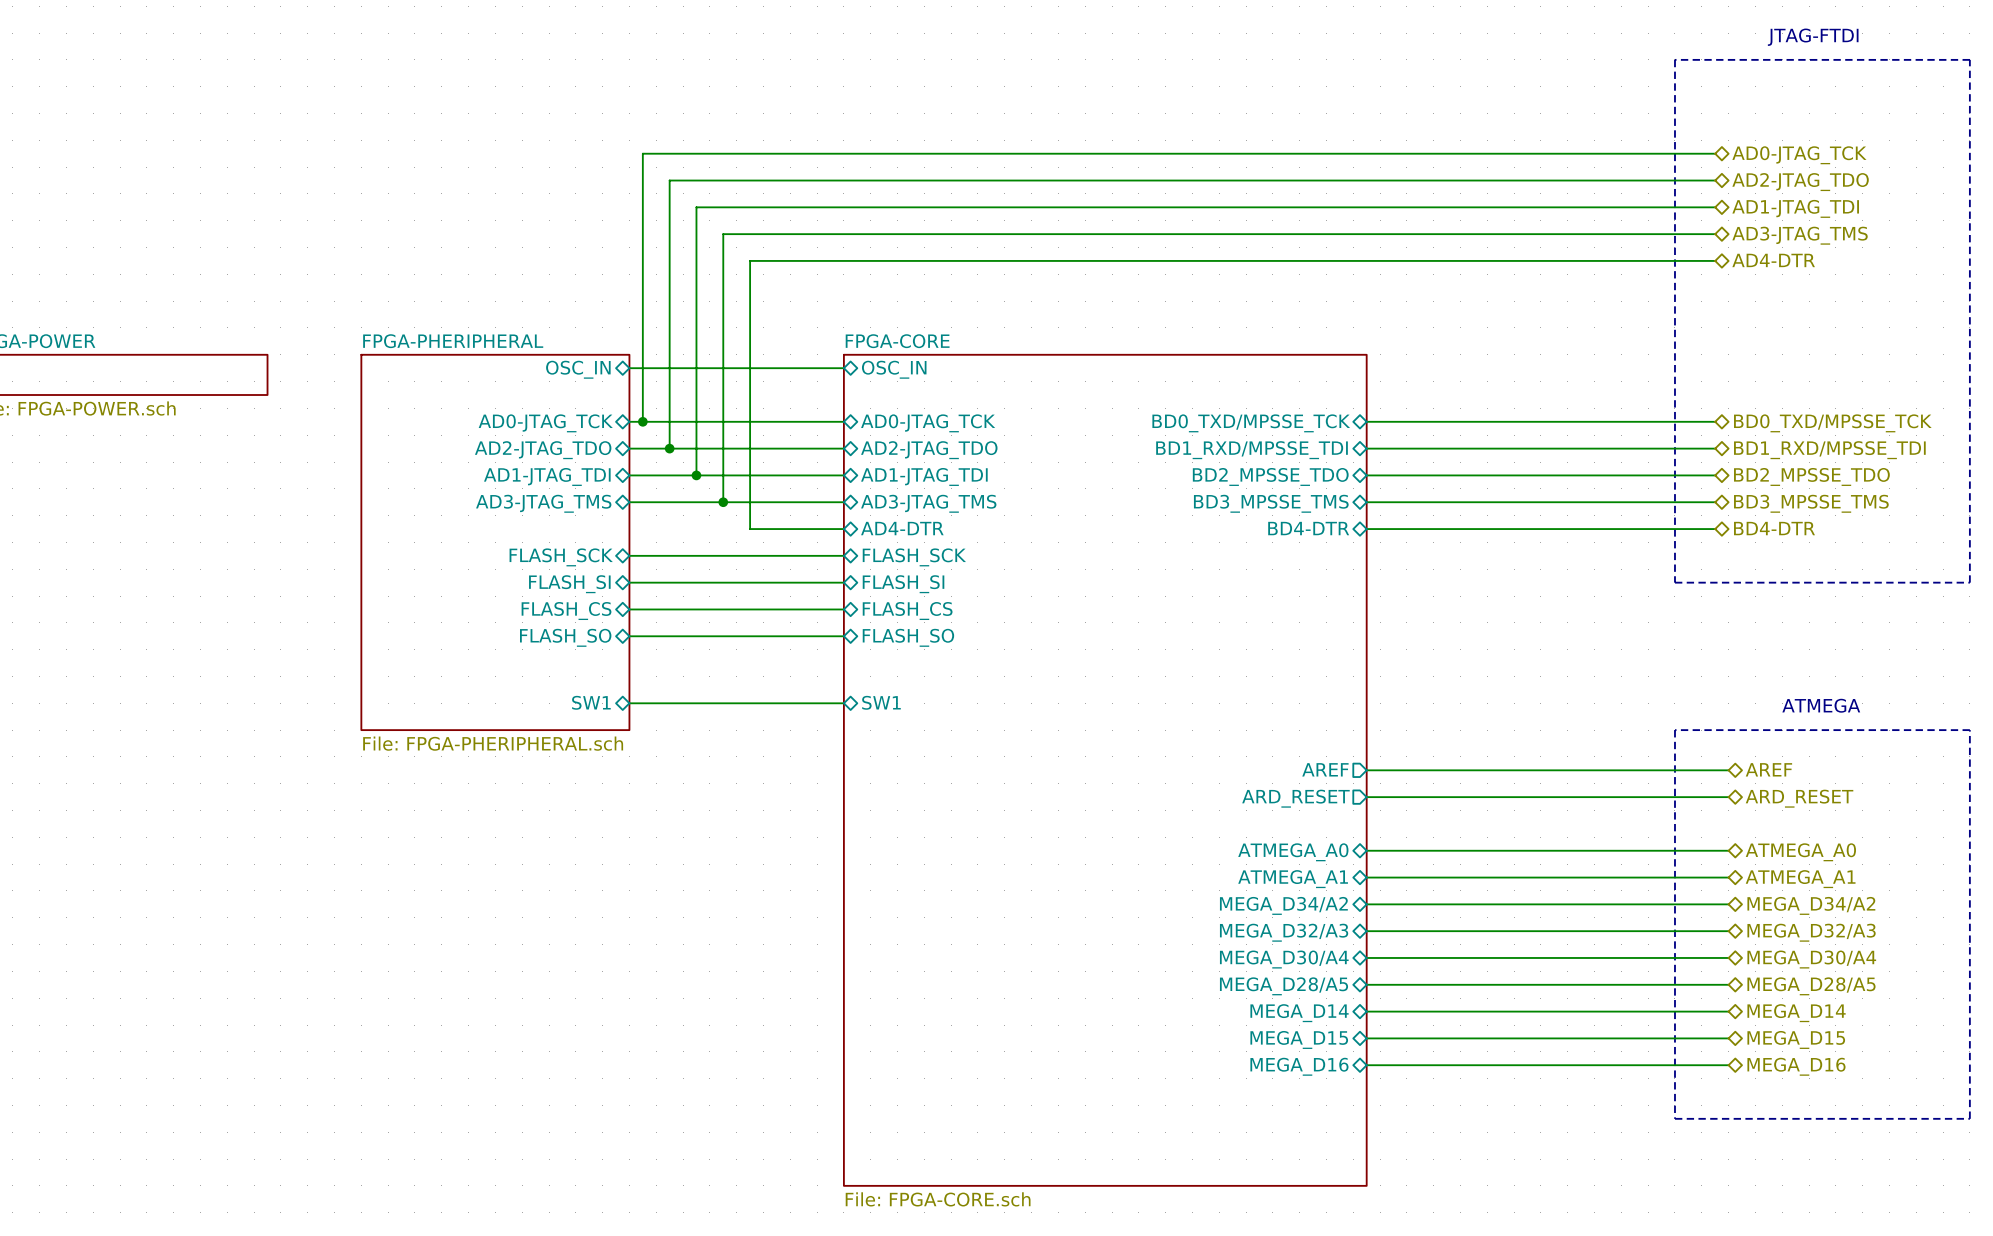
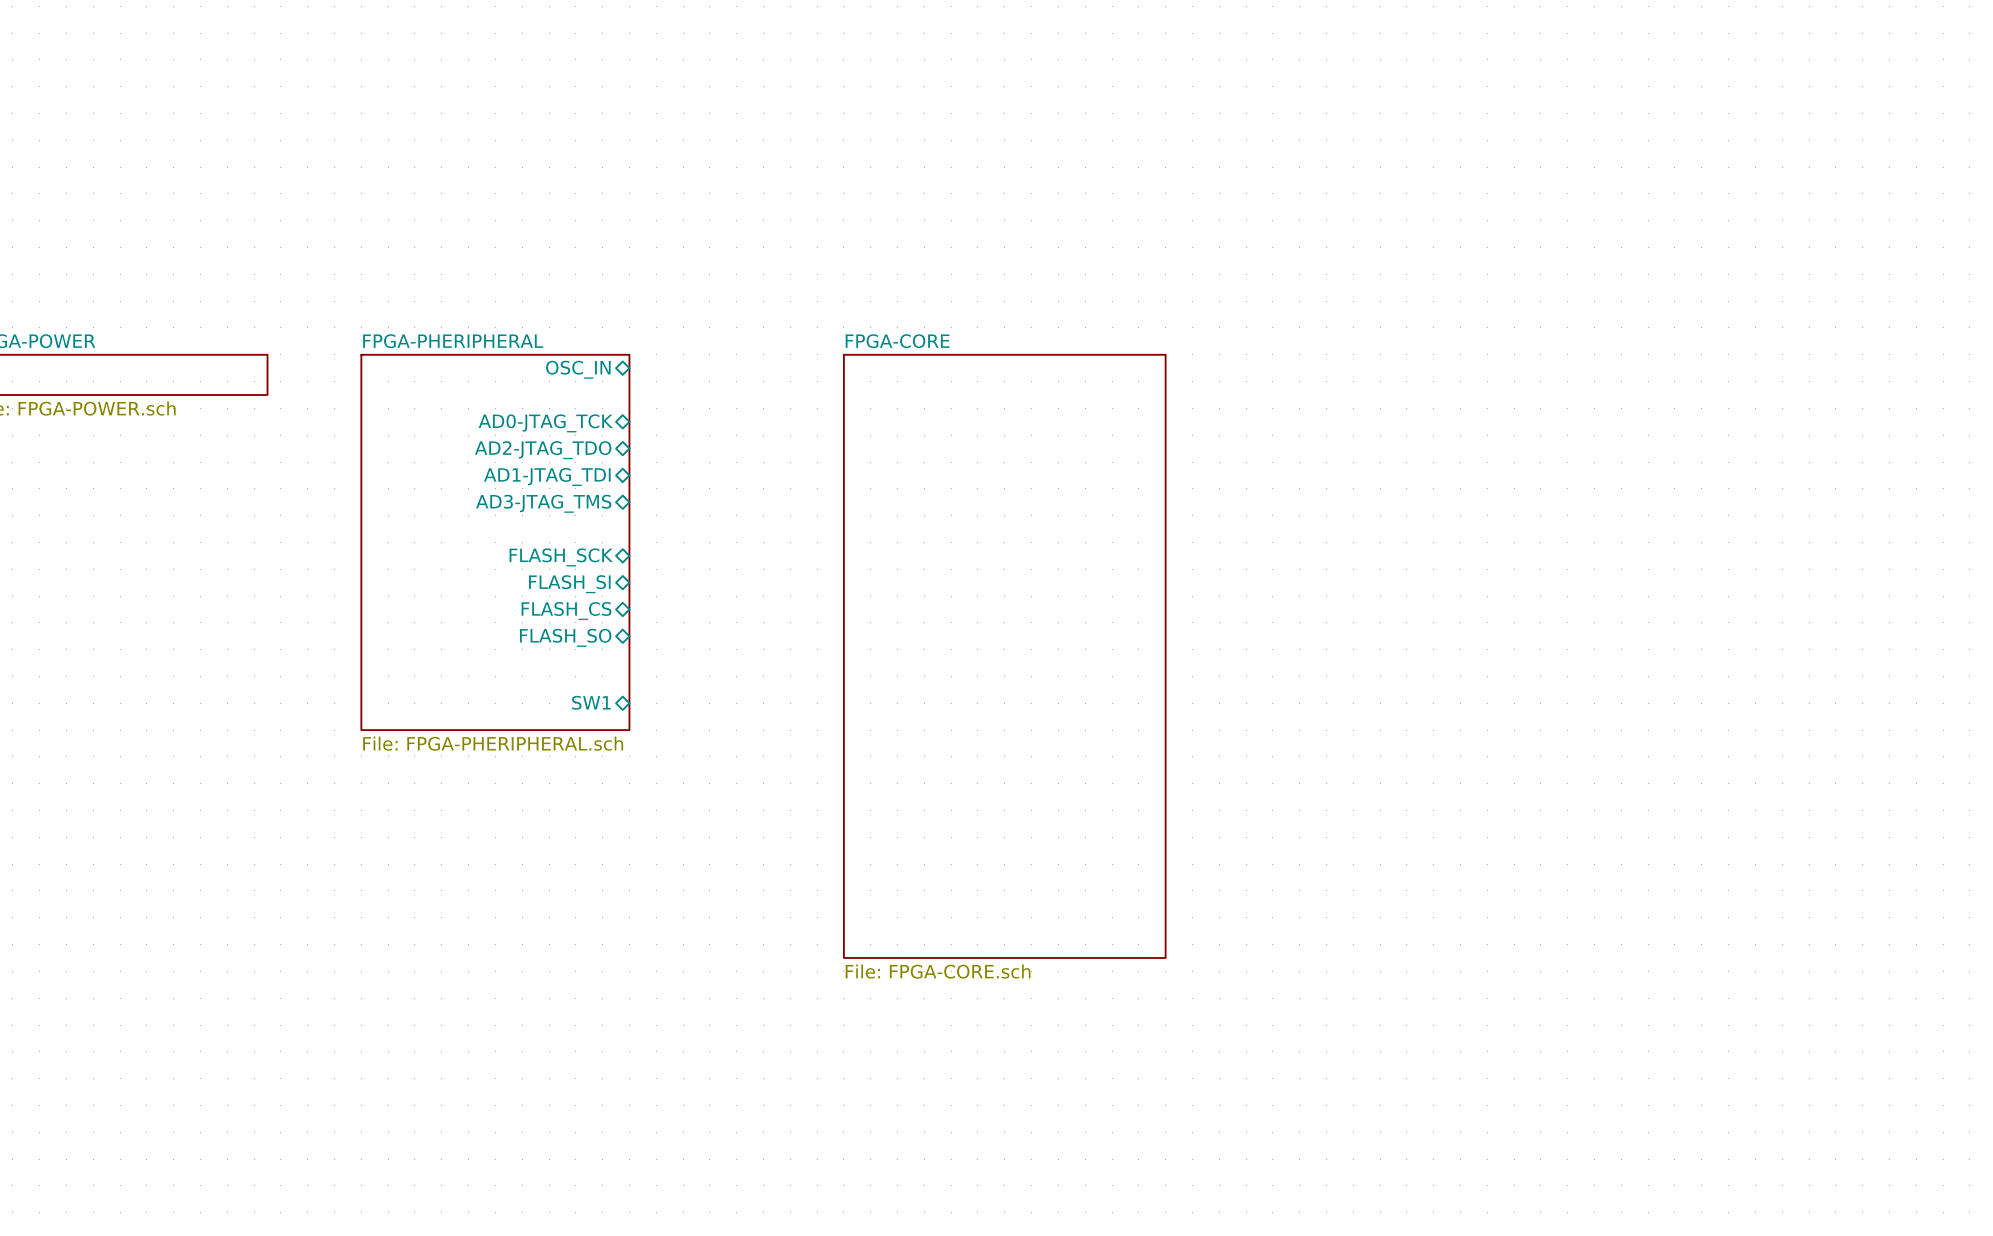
text: JTAG-FTDI (1813, 37) -> none
line: (1674, 59) (1674, 582) (1969, 582) (1969, 59) (1674, 59) -> none
wire: (1715, 153) (642, 153) (642, 421) -> none
hierarchical label: AD0-JTAG_TCK (1799, 155) -> none
wire: (1715, 180) (669, 180) (669, 448) -> none
hierarchical label: AD2-JTAG_TDO (1800, 182) -> none
wire: (1715, 207) (696, 207) (696, 475) -> none
hierarchical label: AD1-JTAG_TDI (1795, 208) -> none
wire: (1715, 234) (723, 234) (723, 502) -> none
hierarchical label: AD3-JTAG_TMS (1800, 235) -> none
wire: (1715, 260) (750, 260) (750, 529) (843, 529) -> none
hierarchical label: AD4-DTR (1773, 260) -> none
wire: (629, 368) (843, 368) -> none
sheet pin: OSC_IN (894, 369) -> none
wire: (629, 421) (843, 421) -> none
junction: (642, 421) -> none
wire: (1366, 421) (1715, 421) -> none
sheet pin: AD0-JTAG_TCK (928, 423) -> none
sheet pin: BD0_TXD/MPSSE_TCK (1251, 423) -> none
hierarchical label: BD0_TXD/MPSSE_TCK (1832, 423) -> none
wire: (629, 448) (843, 448) -> none
junction: (669, 448) -> none
wire: (1366, 448) (1715, 448) -> none
sheet pin: AD2-JTAG_TDO (929, 450) -> none
sheet pin: BD1_RXD/MPSSE_TDI (1252, 450) -> none
hierarchical label: BD1_RXD/MPSSE_TDI (1829, 450) -> none
wire: (629, 475) (843, 475) -> none
junction: (696, 475) -> none
wire: (1366, 475) (1715, 475) -> none
sheet pin: AD1-JTAG_TDI (924, 476) -> none
sheet pin: BD2_MPSSE_TDO (1270, 476) -> none
hierarchical label: BD2_MPSSE_TDO (1811, 476) -> none
wire: (629, 502) (843, 502) -> none
junction: (723, 502) -> none
wire: (1366, 502) (1715, 502) -> none
sheet pin: AD3-JTAG_TMS (928, 503) -> none
sheet pin: BD3_MPSSE_TMS (1271, 503) -> none
hierarchical label: BD3_MPSSE_TMS (1811, 503) -> none
sheet pin: AD4-DTR (902, 528) -> none
sheet pin: BD4-DTR (1308, 528) -> none
hierarchical label: BD4-DTR (1774, 528) -> none
wire: (1366, 529) (1715, 529) -> none
wire: (629, 555) (843, 555) -> none
sheet pin: FLASH_SCK (914, 557) -> none
wire: (629, 582) (843, 582) -> none
sheet pin: FLASH_SI (903, 584) -> none
wire: (629, 609) (843, 609) -> none
sheet pin: FLASH_CS (907, 611) -> none
wire: (629, 636) (843, 636) -> none
sheet pin: FLASH_SO (908, 637) -> none
sheet FPGA-CORE: none -> File: FPGA-CORE.sch (1004, 656)
sheet pin: SW1 (881, 702) -> none
wire: (629, 703) (843, 703) -> none
text: ATMEGA (1821, 705) -> none
line: (1674, 730) (1674, 1118) (1969, 1118) (1969, 730) (1674, 730) -> none
sheet pin: AREF (1325, 769) -> none
hierarchical label: AREF (1768, 769) -> none
sheet FPGA-CORE: File: FPGA-CORE.sch (1105, 770) -> none
wire: (1366, 770) (1728, 770) -> none
wire: (1366, 797) (1728, 797) -> none
sheet pin: ARD_RESET (1295, 798) -> none
hierarchical label: ARD_RESET (1799, 798) -> none
wire: (1366, 850) (1728, 850) -> none
sheet pin: ATMEGA_A0 (1293, 852) -> none
hierarchical label: ATMEGA_A0 (1800, 852) -> none
wire: (1366, 877) (1728, 877) -> none
sheet pin: ATMEGA_A1 (1293, 879) -> none
hierarchical label: ATMEGA_A1 (1800, 879) -> none
wire: (1366, 904) (1728, 904) -> none
sheet pin: MEGA_D34/A2 (1283, 905) -> none
hierarchical label: MEGA_D34/A2 (1811, 905) -> none
wire: (1366, 931) (1728, 931) -> none
sheet pin: MEGA_D32/A3 (1284, 932) -> none
hierarchical label: MEGA_D32/A3 (1811, 932) -> none
wire: (1366, 957) (1728, 957) -> none
sheet pin: MEGA_D30/A4 (1284, 959) -> none
hierarchical label: MEGA_D30/A4 (1811, 959) -> none
wire: (1366, 984) (1728, 984) -> none
sheet pin: MEGA_D28/A5 (1284, 986) -> none
hierarchical label: MEGA_D28/A5 (1811, 986) -> none
wire: (1366, 1011) (1728, 1011) -> none
sheet pin: MEGA_D14 (1299, 1013) -> none
hierarchical label: MEGA_D14 (1796, 1013) -> none
wire: (1366, 1038) (1728, 1038) -> none
sheet pin: MEGA_D15 (1299, 1039) -> none
hierarchical label: MEGA_D15 (1796, 1039) -> none
wire: (1366, 1065) (1728, 1065) -> none
sheet pin: MEGA_D16 (1299, 1066) -> none
hierarchical label: MEGA_D16 (1796, 1066) -> none

